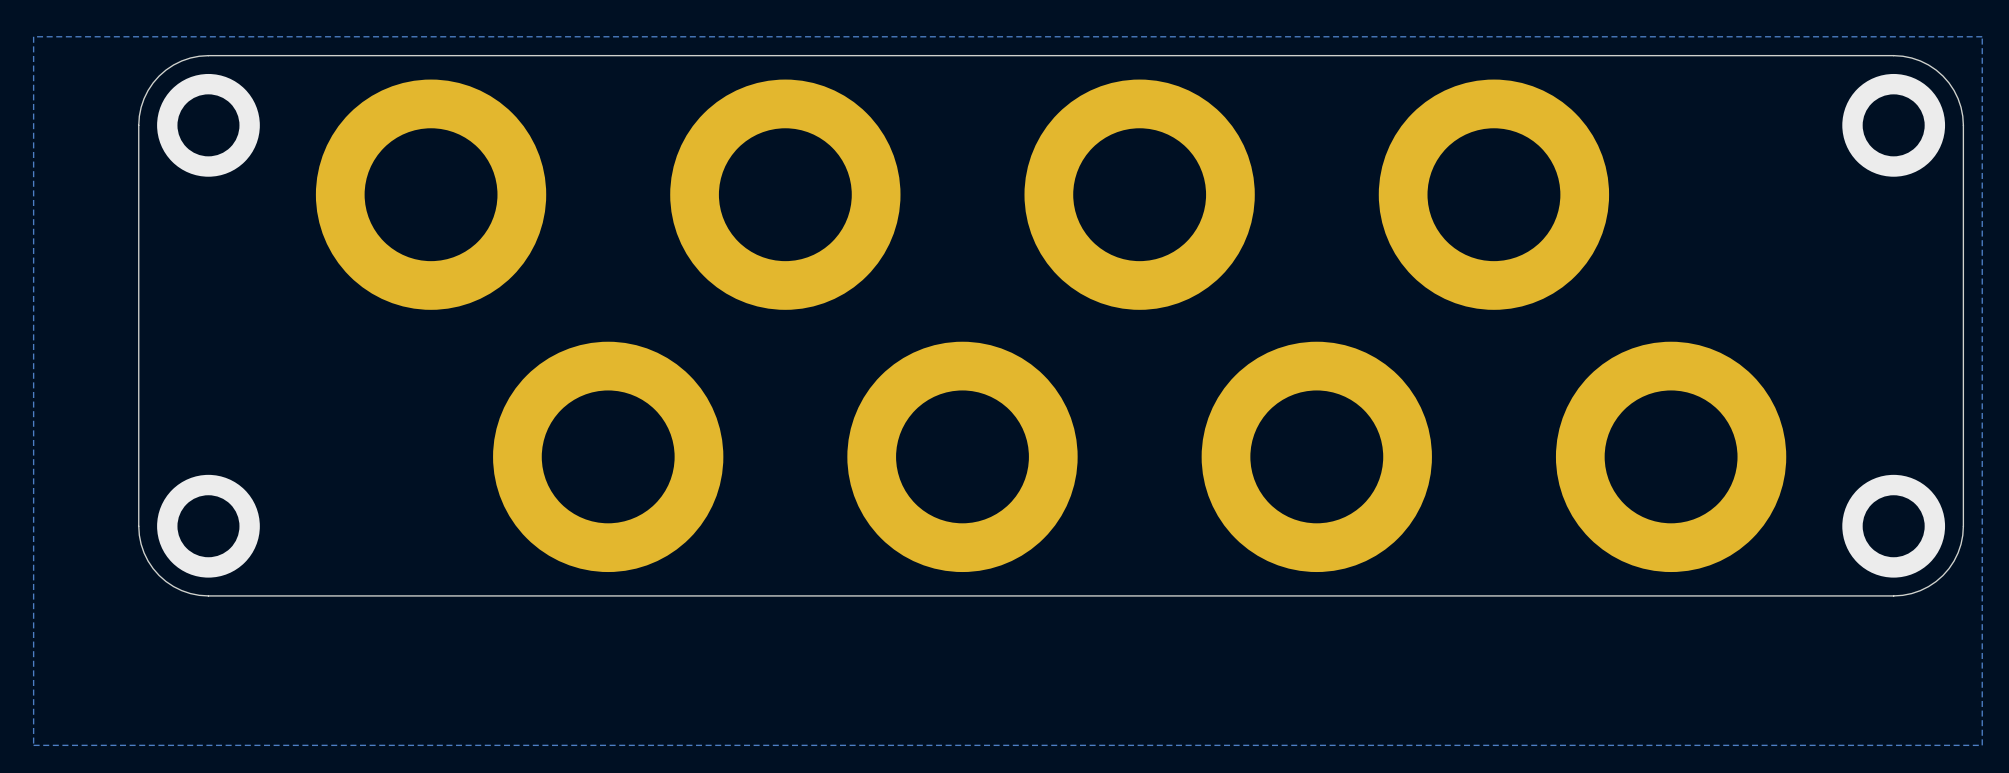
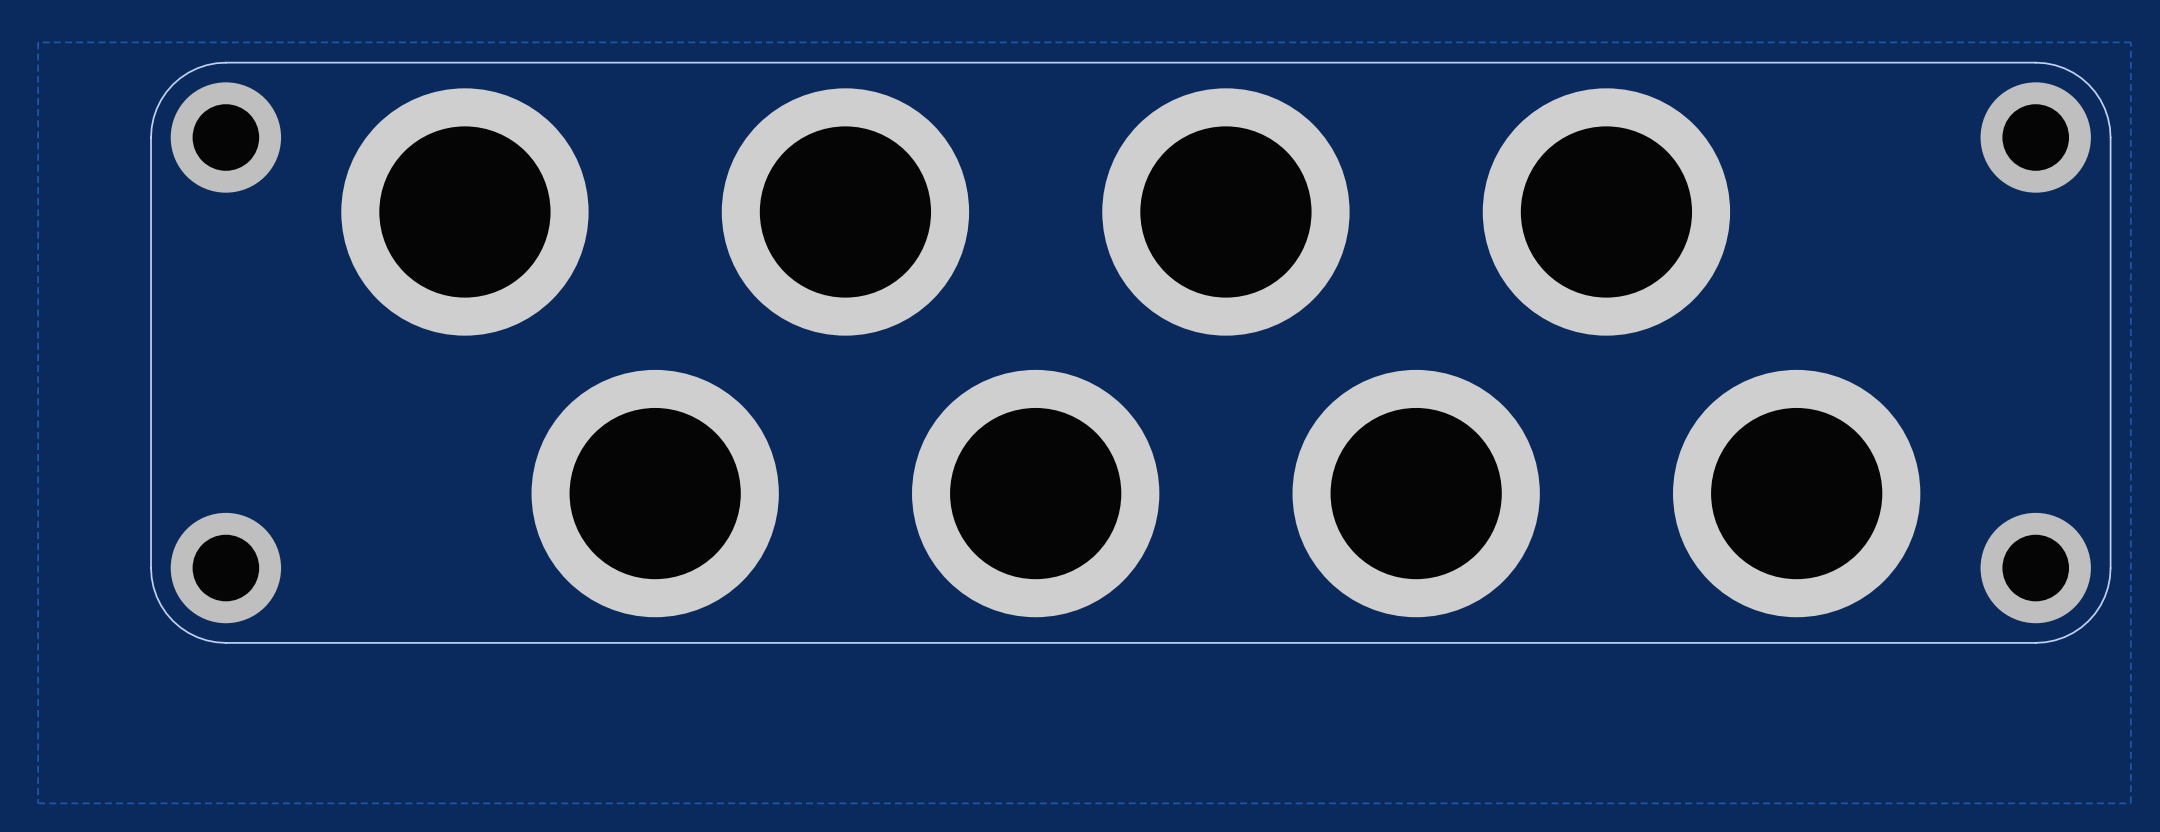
part footprint: [315, 79, 547, 310] -> [341, 88, 589, 336]
part footprint: [670, 79, 901, 310] -> [721, 88, 970, 336]
part footprint: [1024, 79, 1255, 310] -> [1102, 88, 1350, 336]
part footprint: [1378, 79, 1610, 310] -> [1482, 88, 1731, 336]
part footprint: [493, 341, 724, 573] -> [531, 369, 779, 618]
part footprint: [847, 341, 1078, 573] -> [912, 369, 1160, 618]
part footprint: [1201, 341, 1432, 573] -> [1292, 369, 1540, 618]
part footprint: [1555, 341, 1787, 573] -> [1673, 369, 1921, 618]

